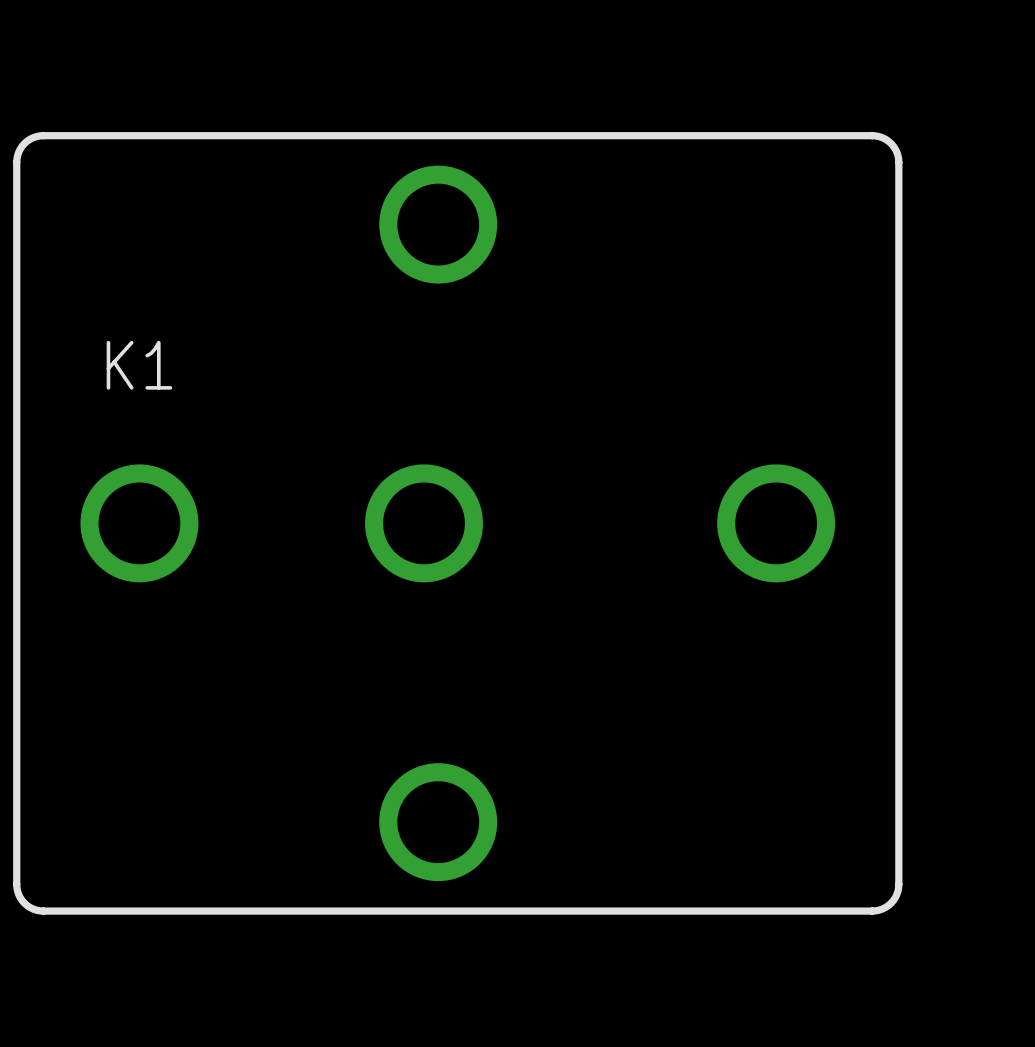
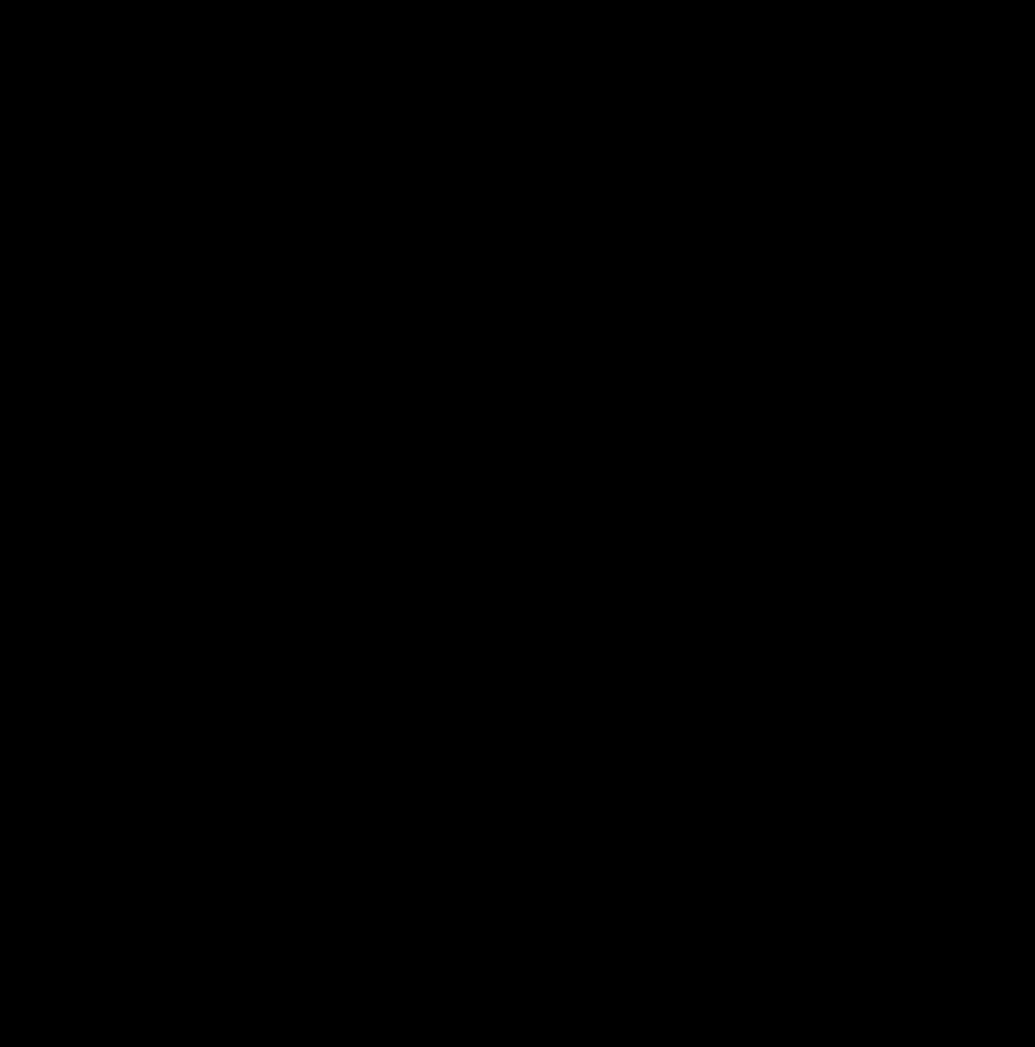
K1: (457, 523) -> none

